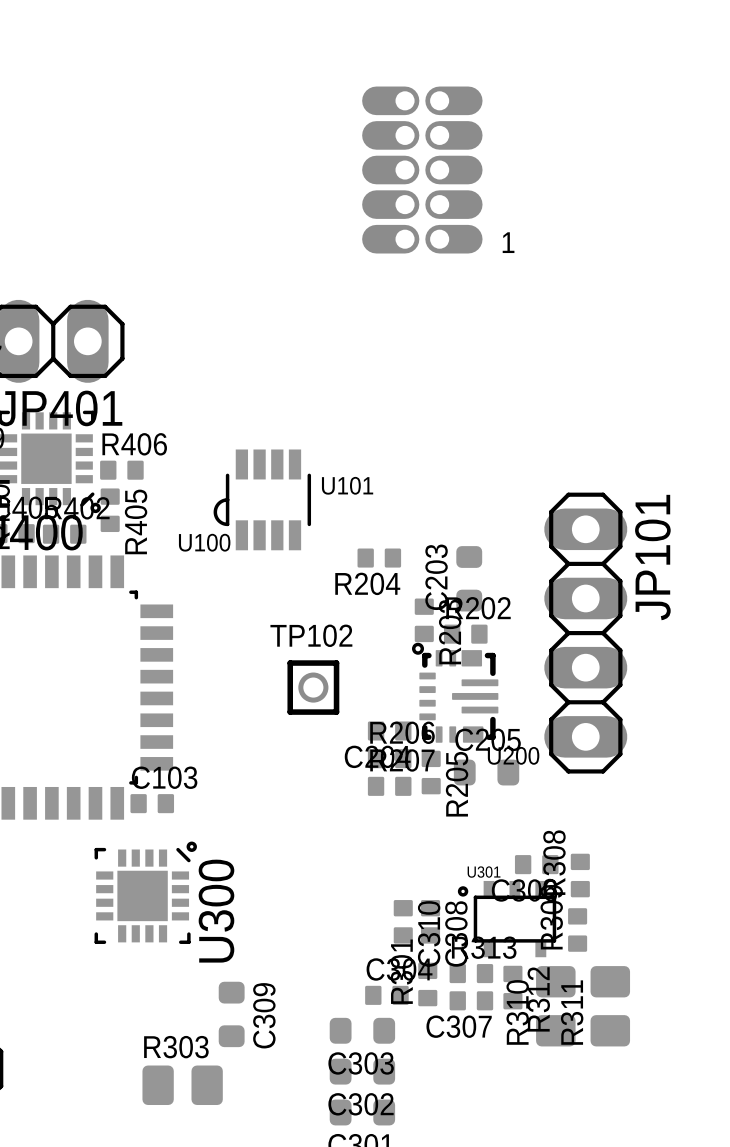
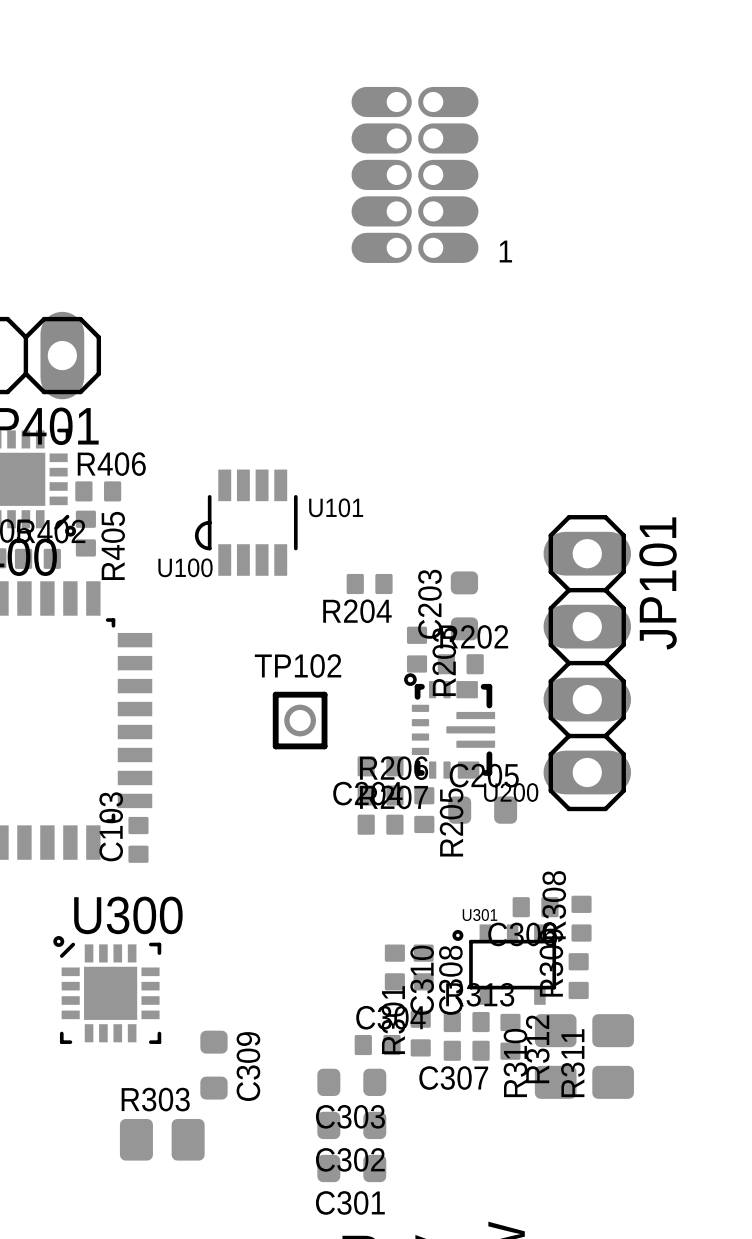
C103 rotation: 0° (152, 803) -> 90° clockwise (138, 839)
U300 rotation: 0° (145, 892) -> 90° counterclockwise (107, 990)

